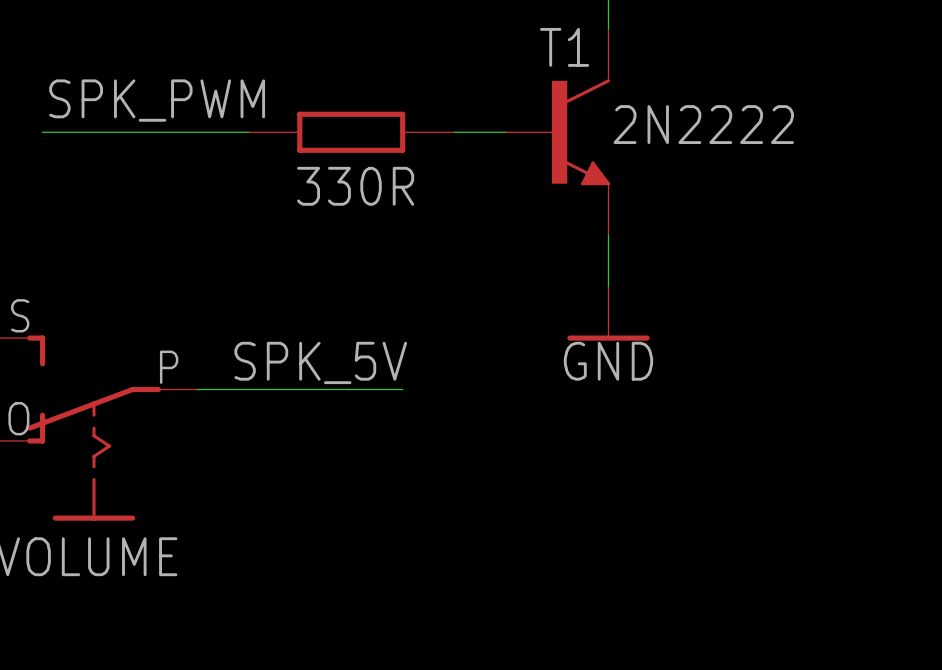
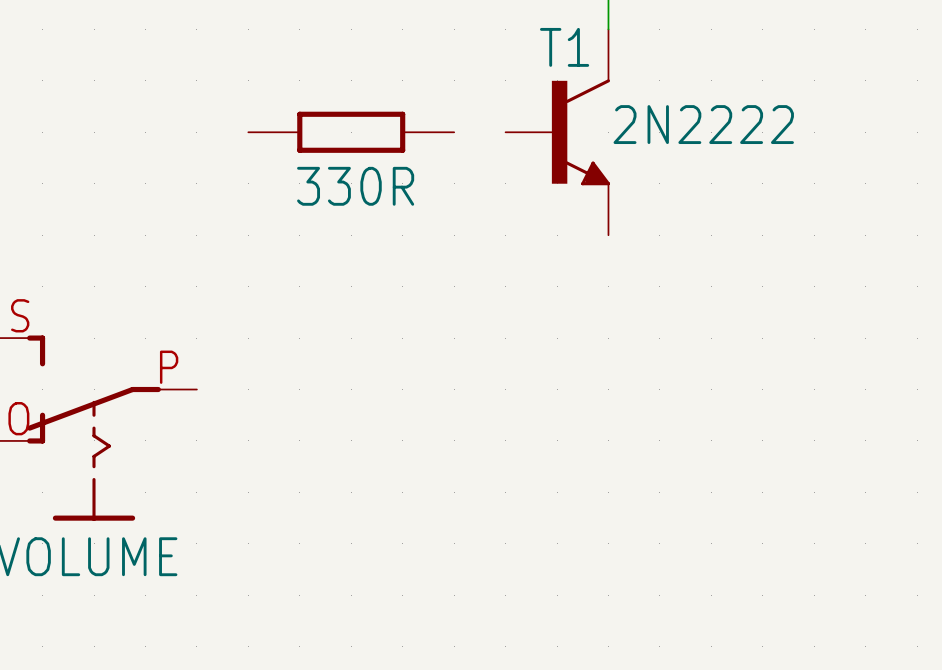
label: SPK_PWM (157, 100) -> none
wire: (42, 132) (248, 132) -> none
wire: (454, 132) (505, 132) -> none
wire: (608, 235) (608, 286) -> none
power symbol: GND (608, 313) -> none
label: SPK_5V (320, 362) -> none
wire: (196, 389) (402, 389) -> none

